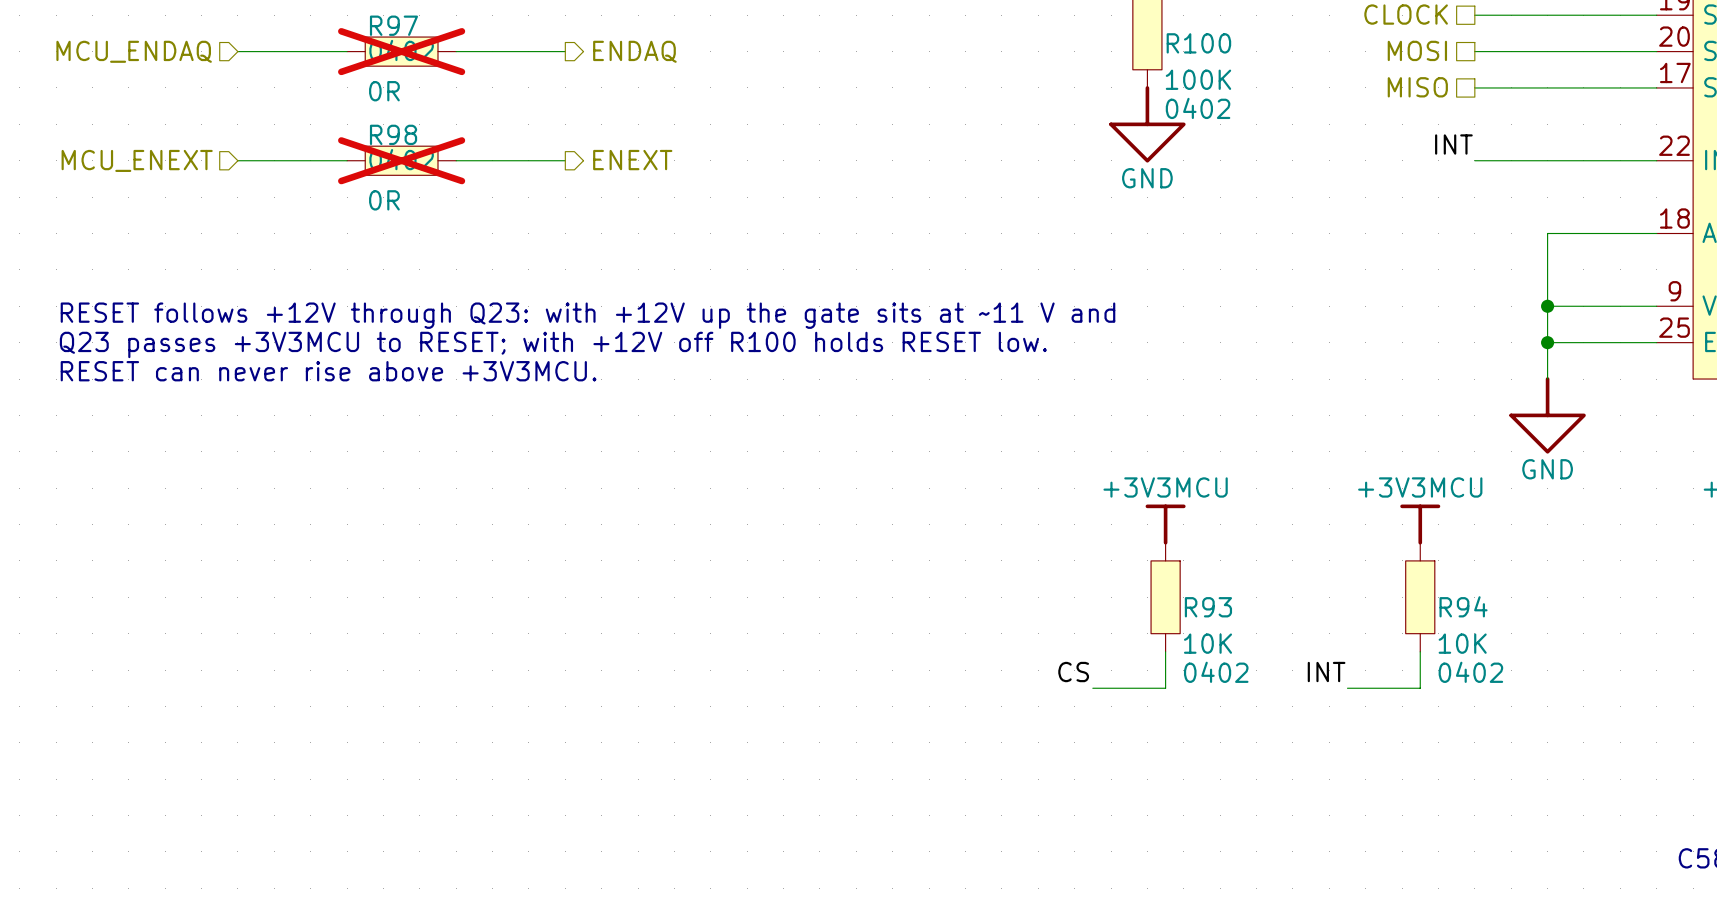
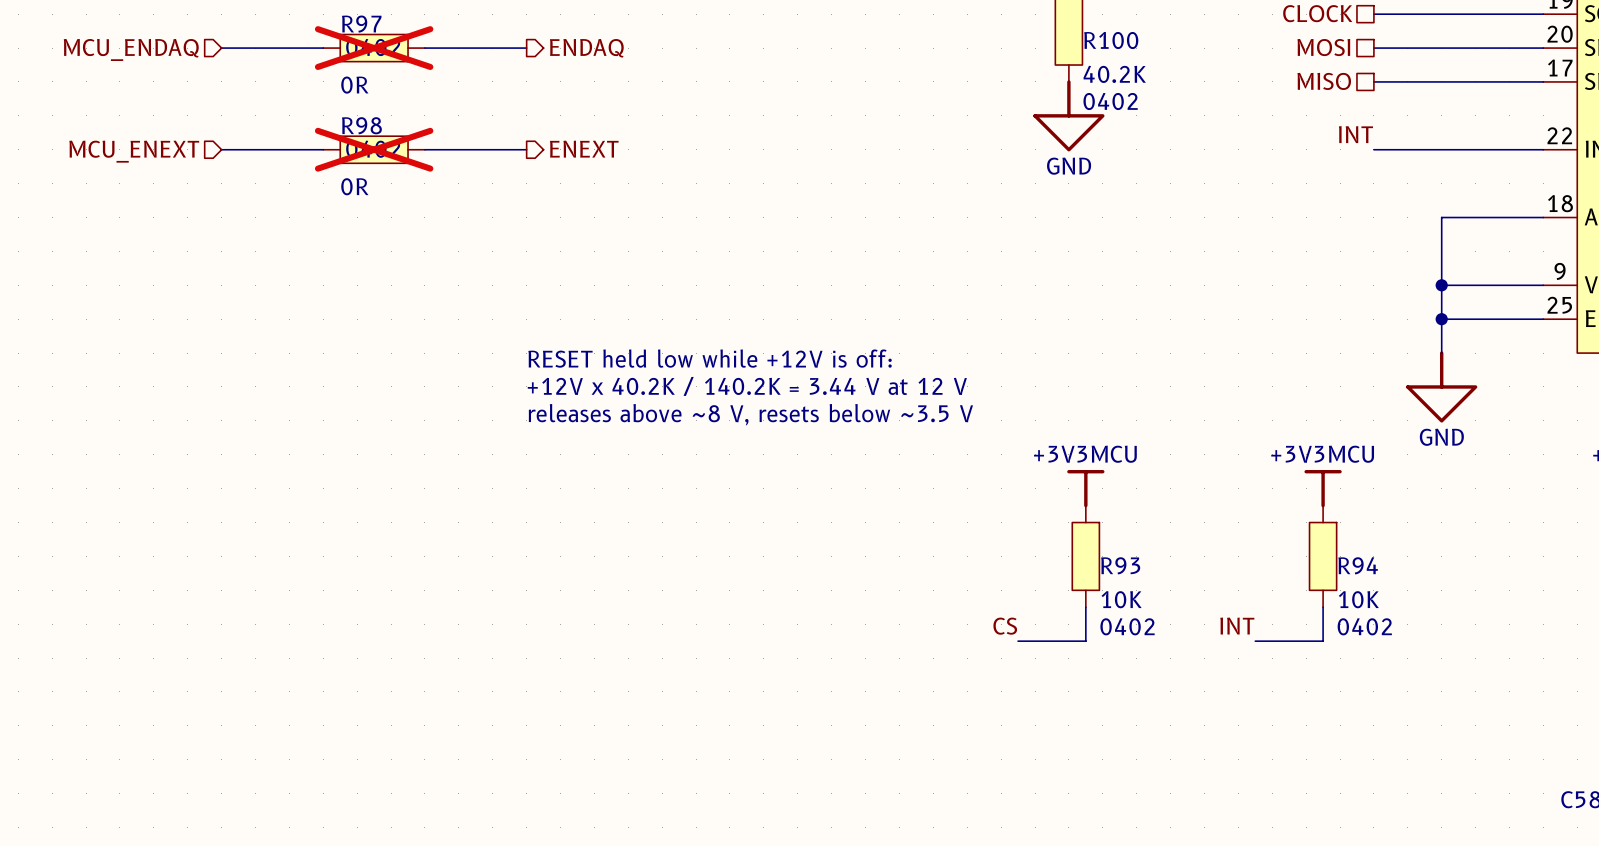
R100 text: 100K (1198, 79) -> 40.2K (1114, 74)
text: RESET follows +12V through Q23: with +12V up the gate sits at ~11 V and (587, 315) -> none
text: Q23 passes +3V3MCU to RESET; with +12V off R100 holds RESET low. (553, 344) -> none
text: RESET can never rise above +3V3MCU. (328, 371) -> none
text: none -> RESET held low while +12V is off: (710, 358)
text: none -> +12V x 40.2K / 140.2K = 3.44 V at 12 V (747, 386)
text: none -> releases above ~8 V, resets below ~3.5 V (750, 414)

